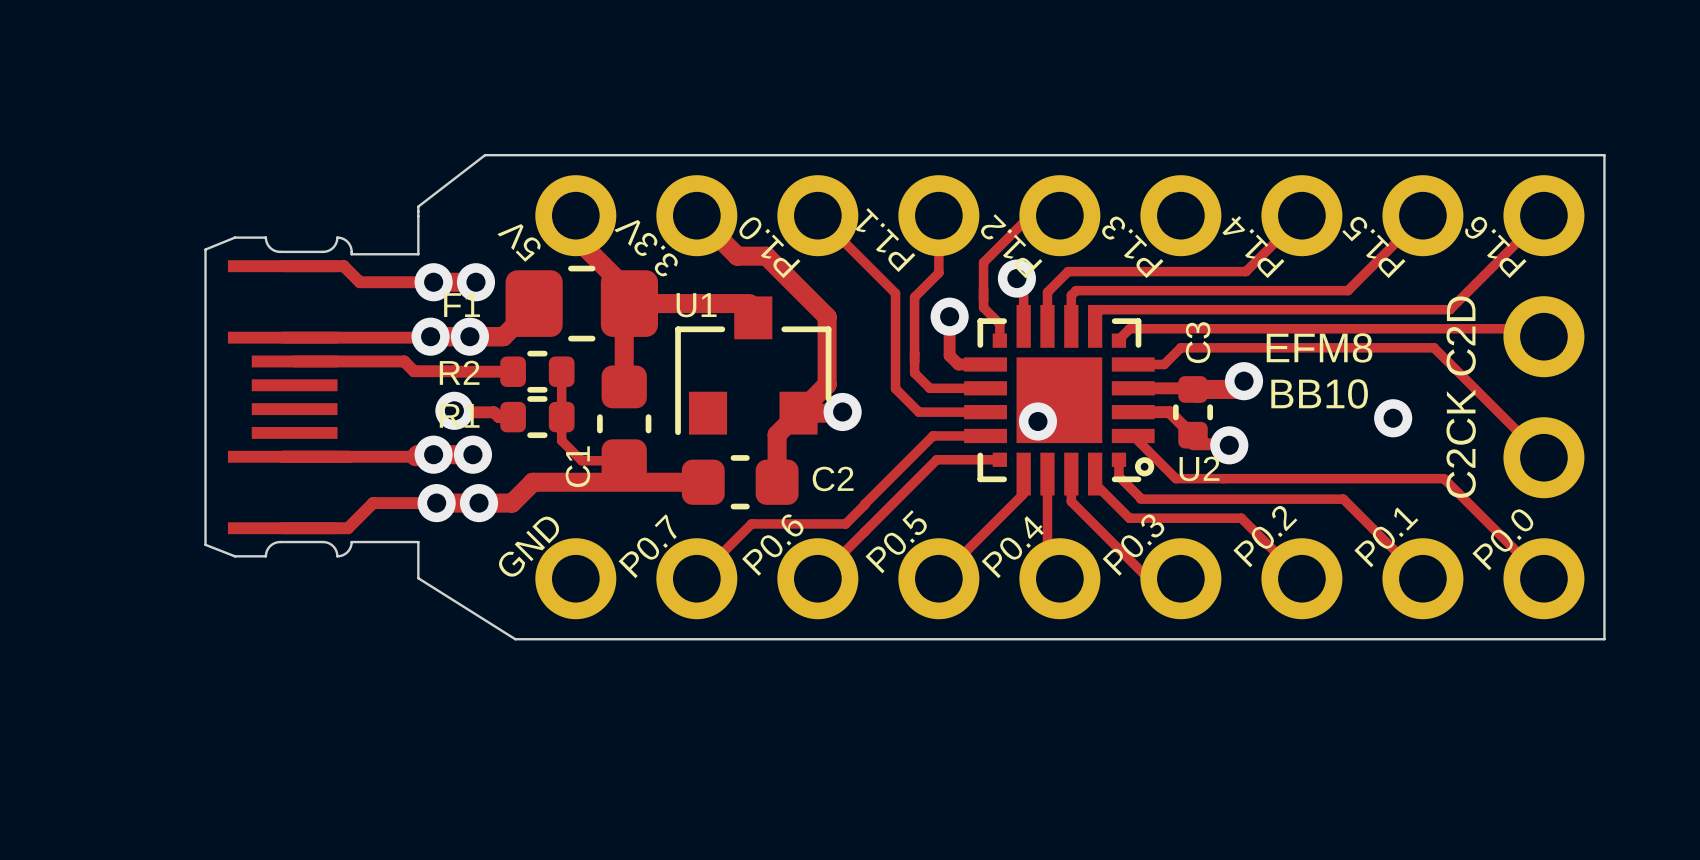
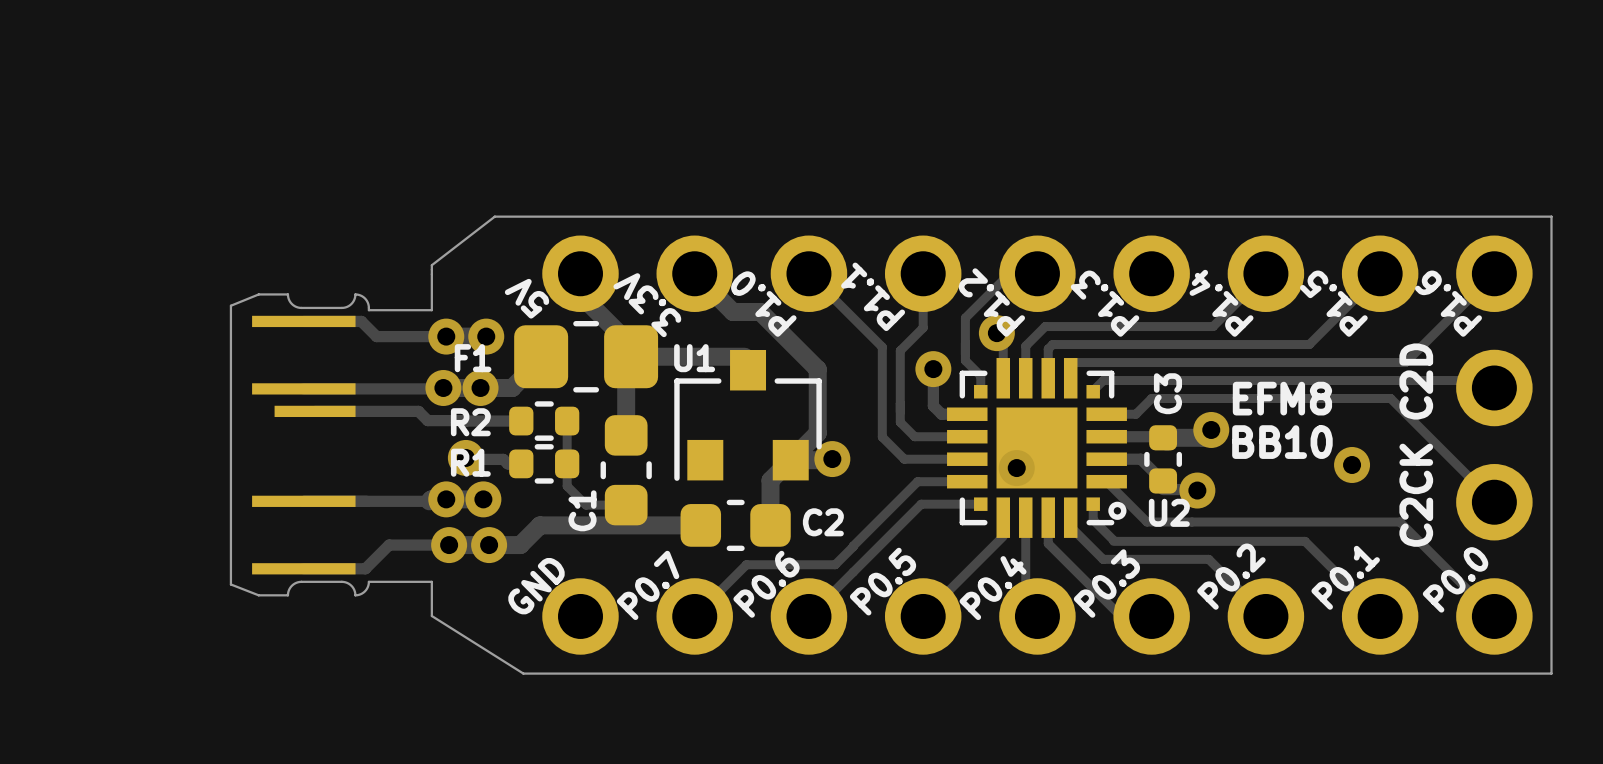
part footprint: [227, 260, 338, 535] -> [252, 315, 356, 575]

